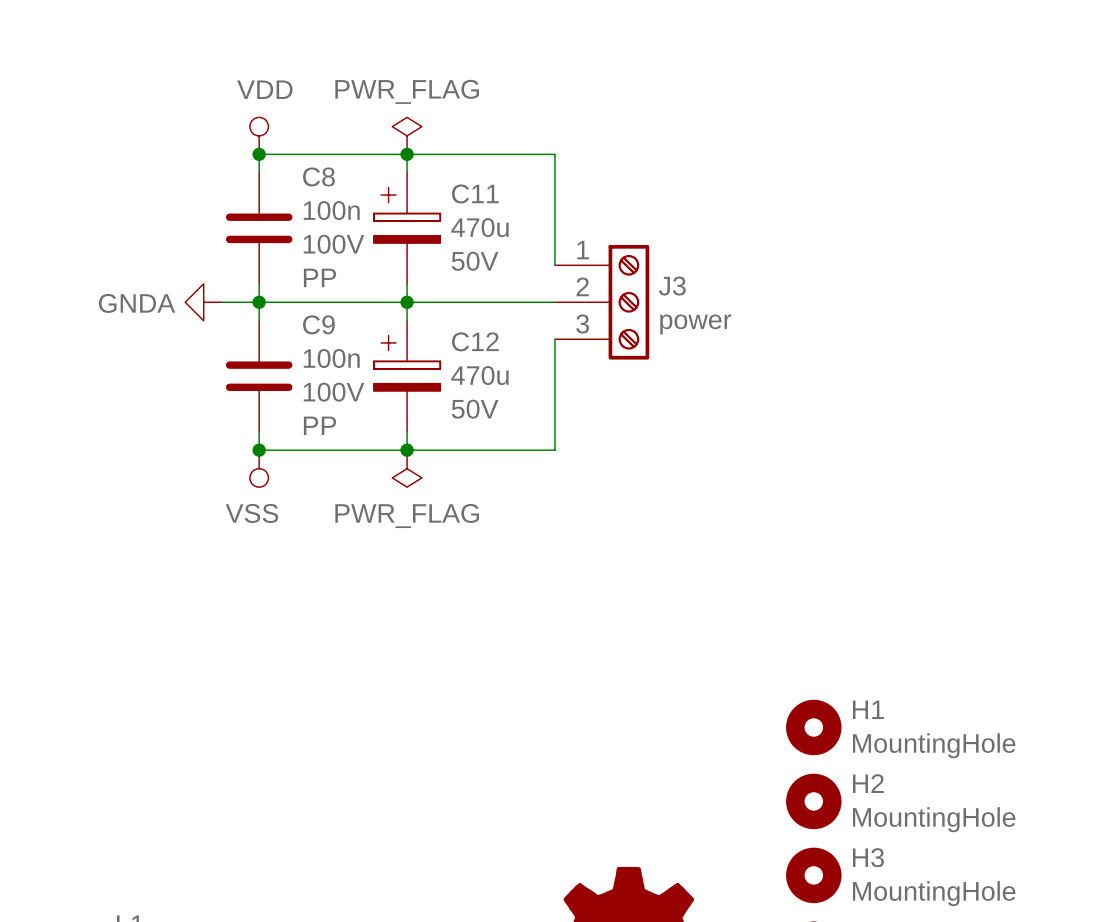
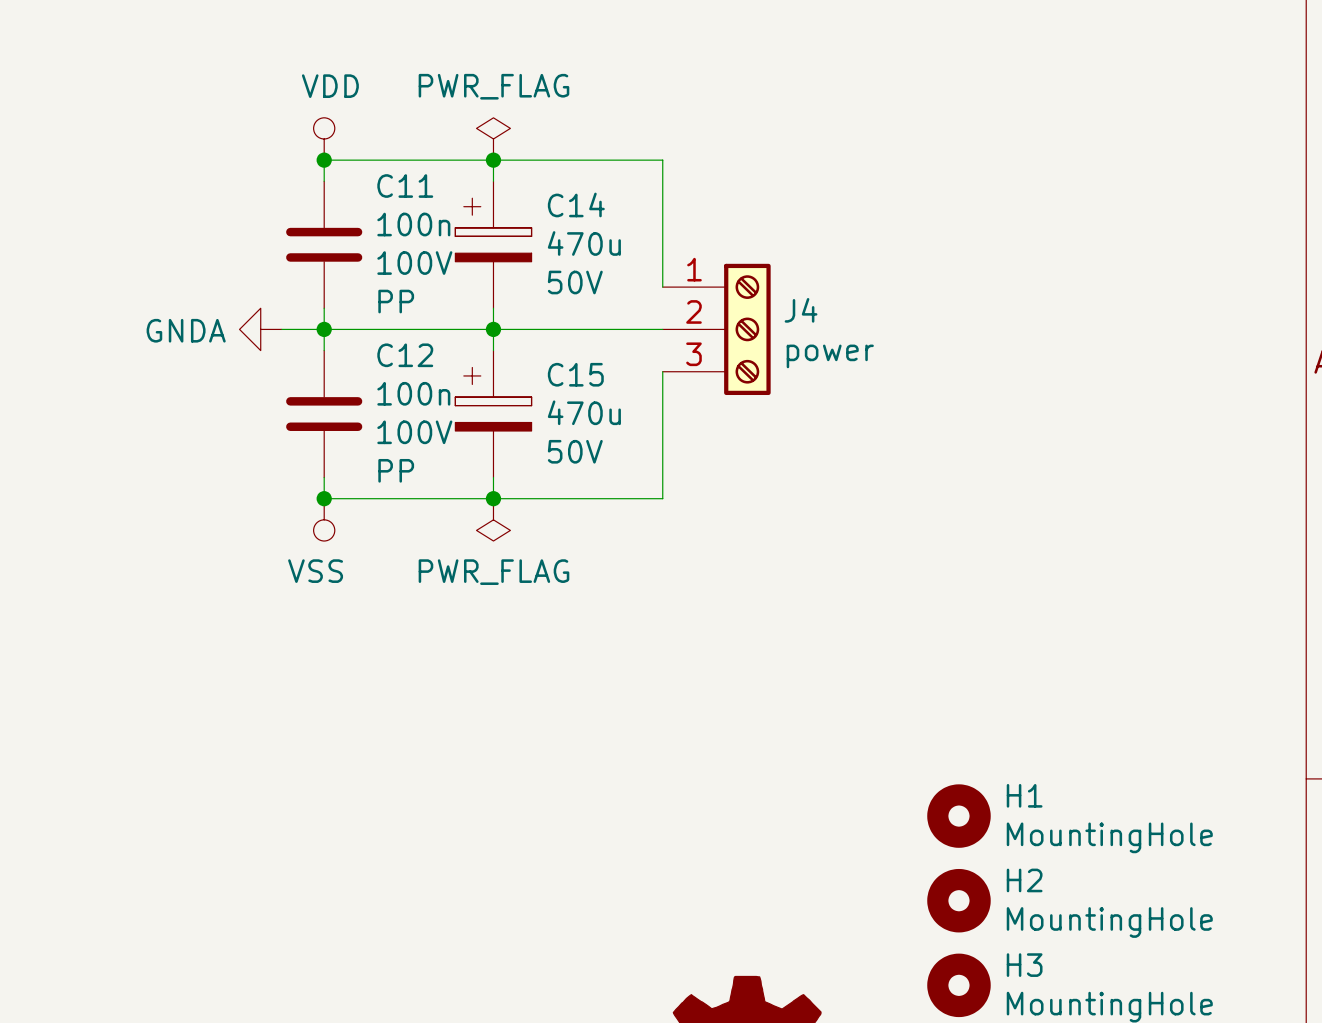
C8 name: C8 (318, 176) -> C11 (405, 186)
C11 name: C11 (475, 193) -> C14 (576, 204)
J3 name: J3 (672, 286) -> J4 (801, 310)
C9 name: C9 (318, 324) -> C12 (405, 355)
C12 name: C12 (475, 341) -> C15 (575, 374)

